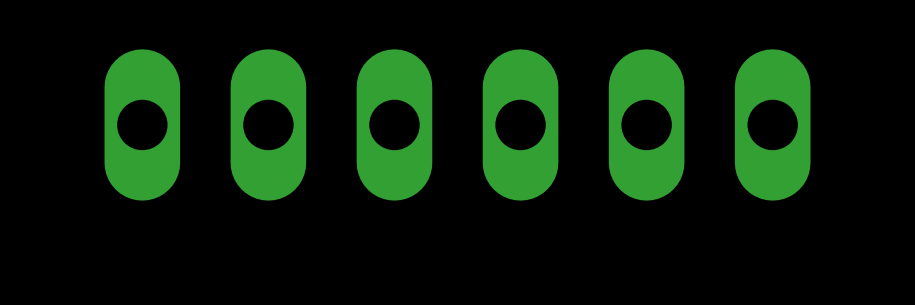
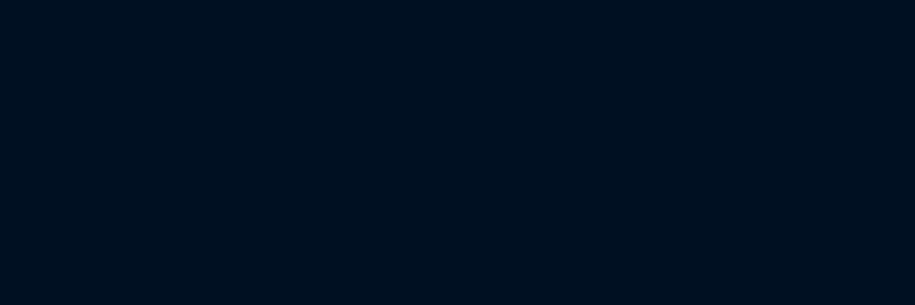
part: (457, 124) -> none

